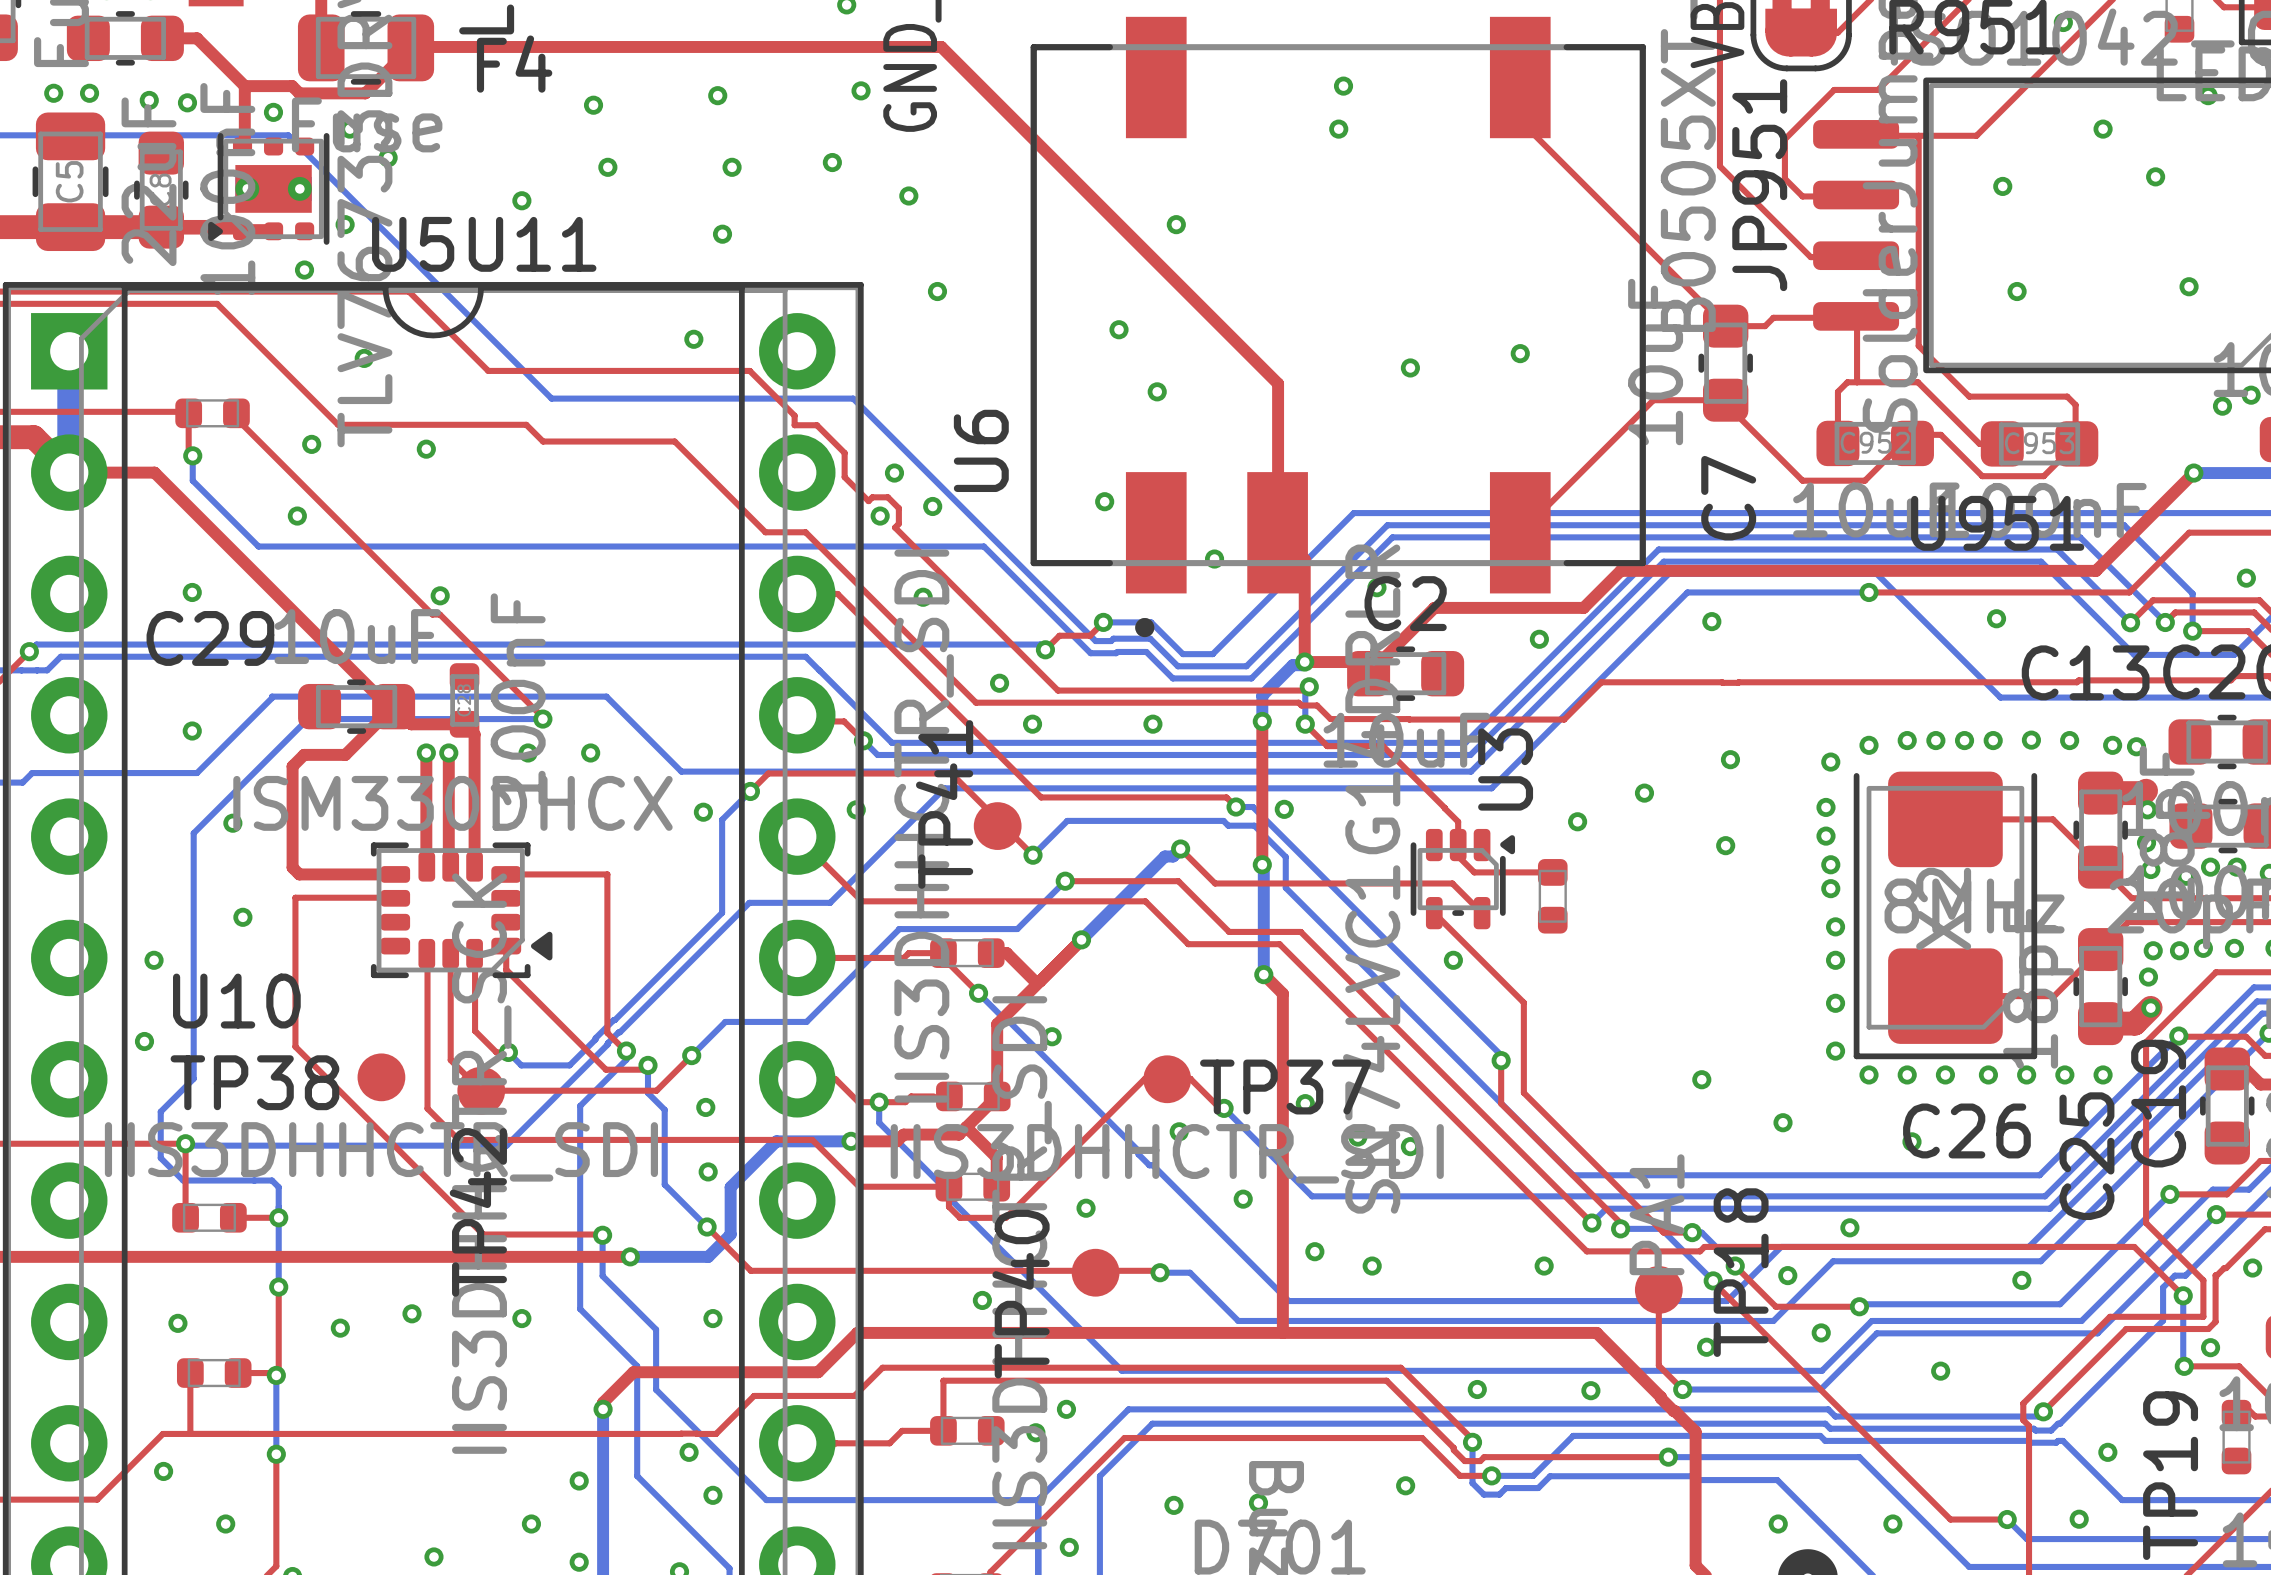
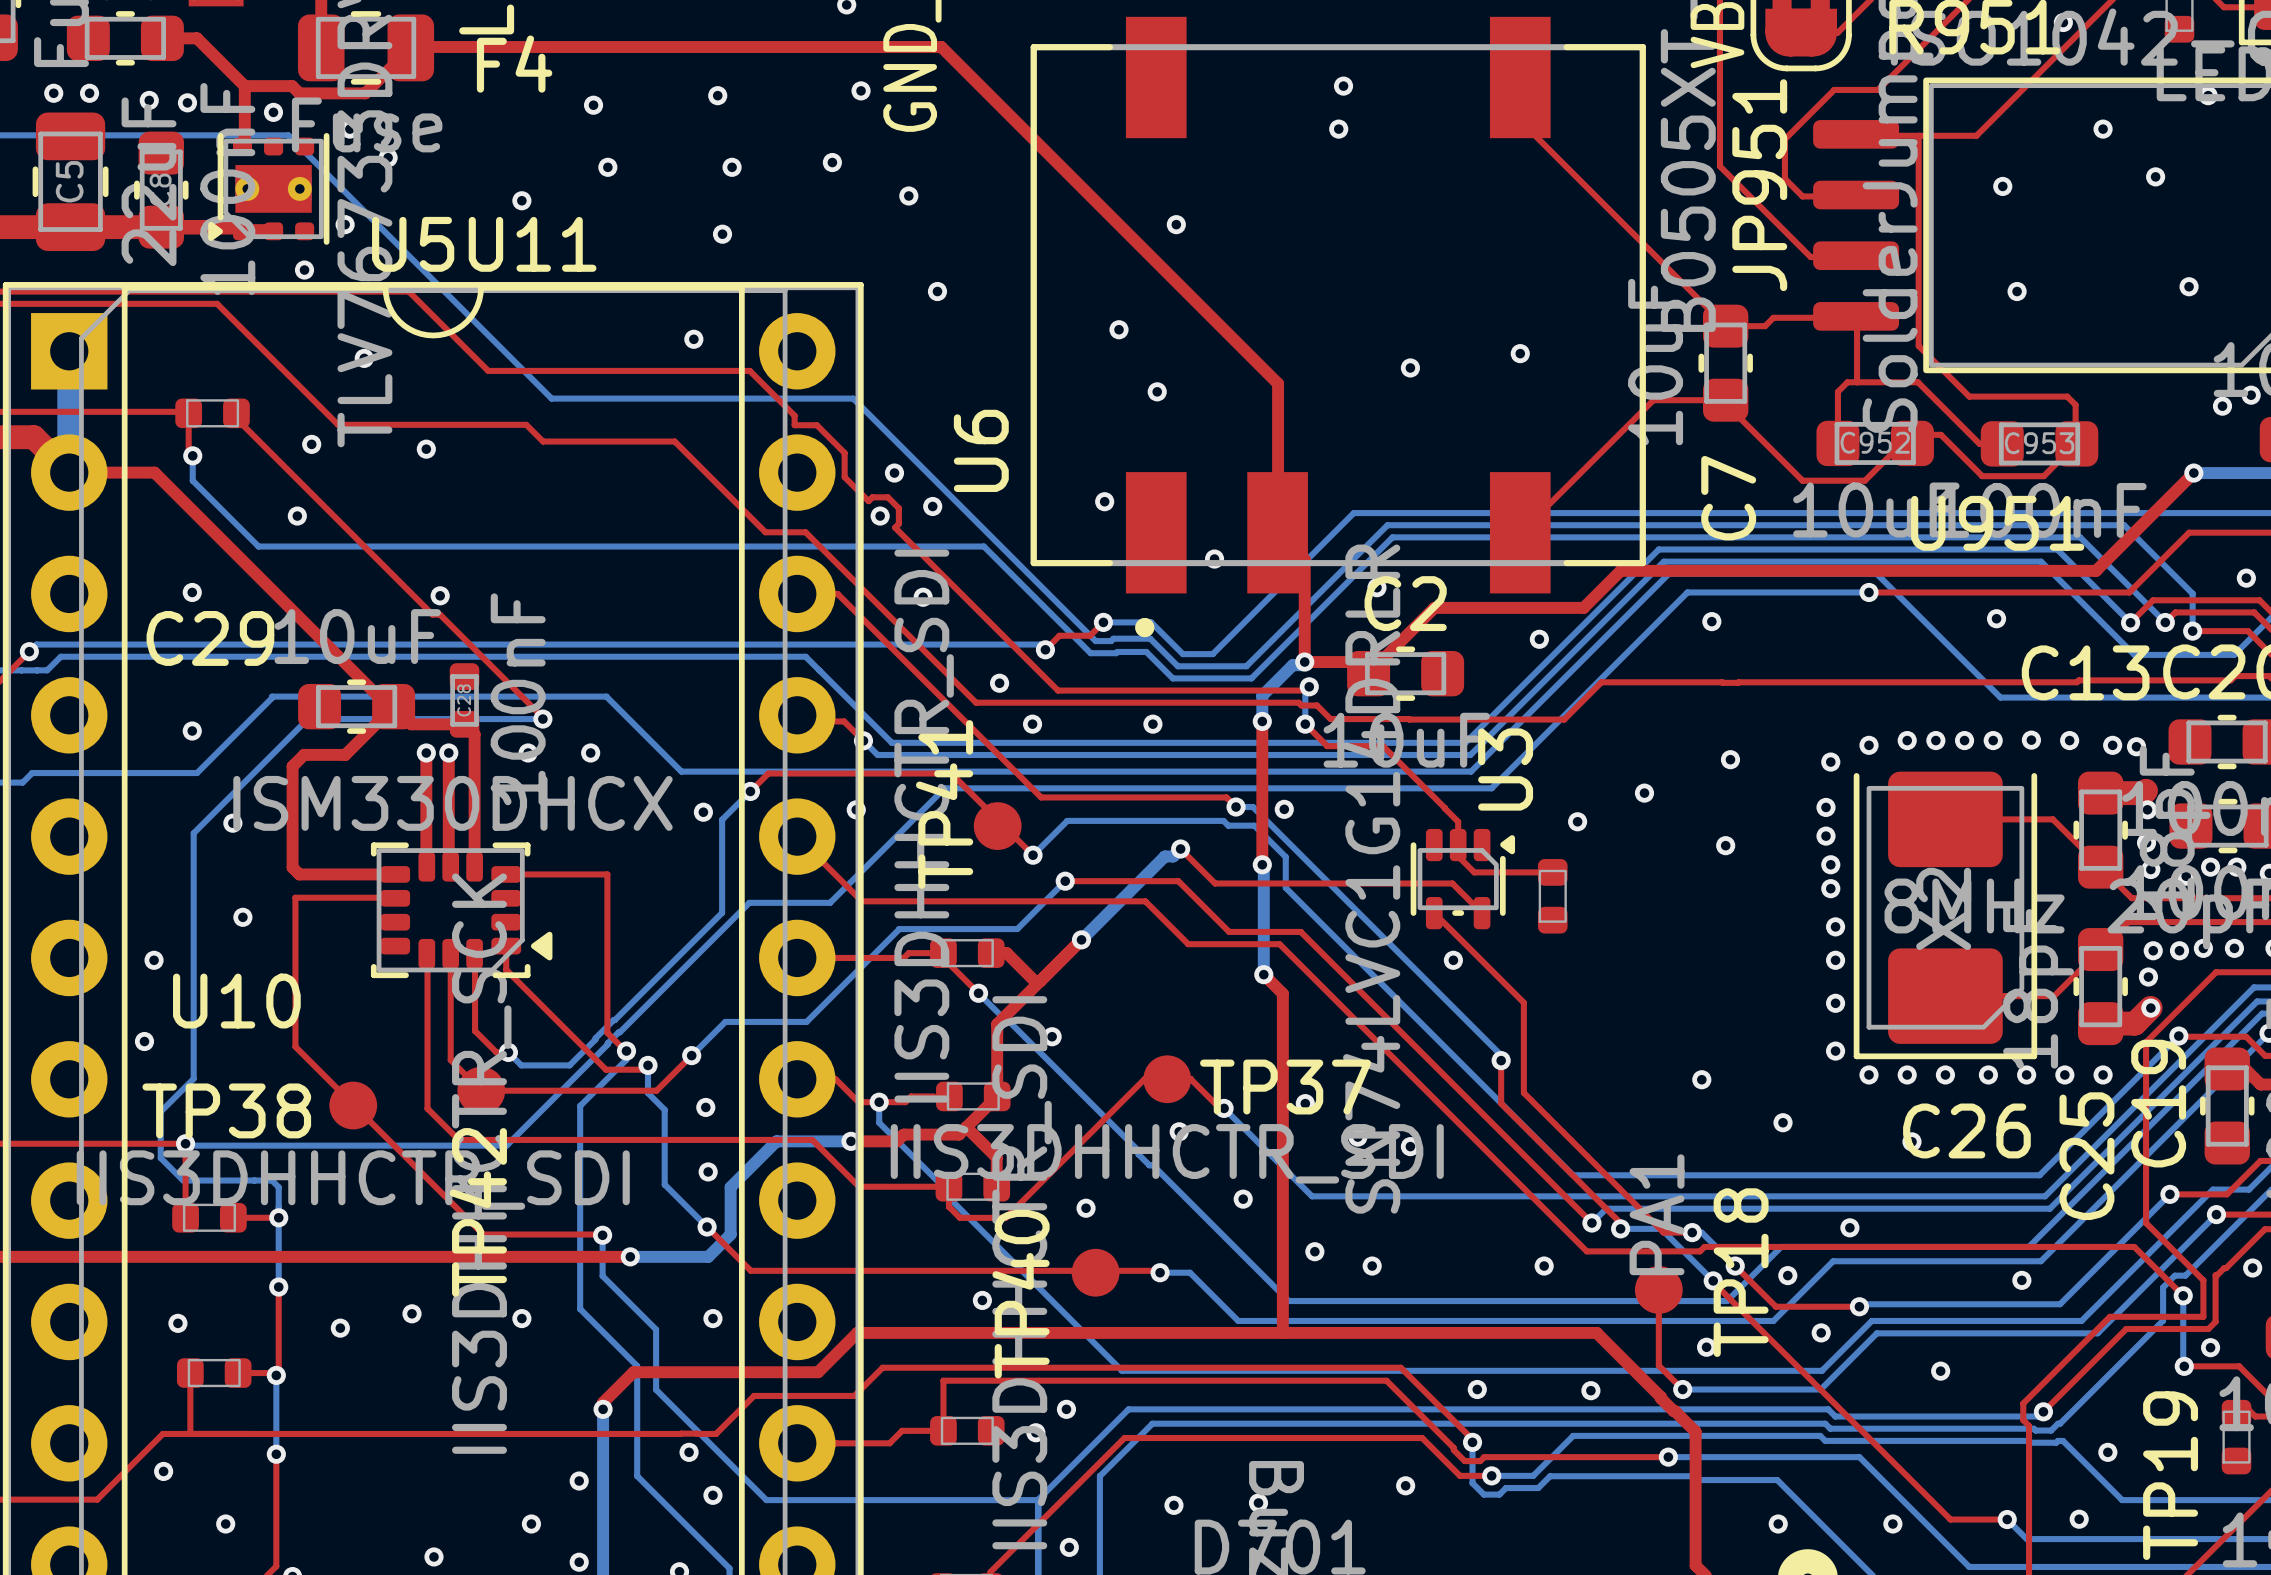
TP38 position: (381, 1077) -> (353, 1105)

